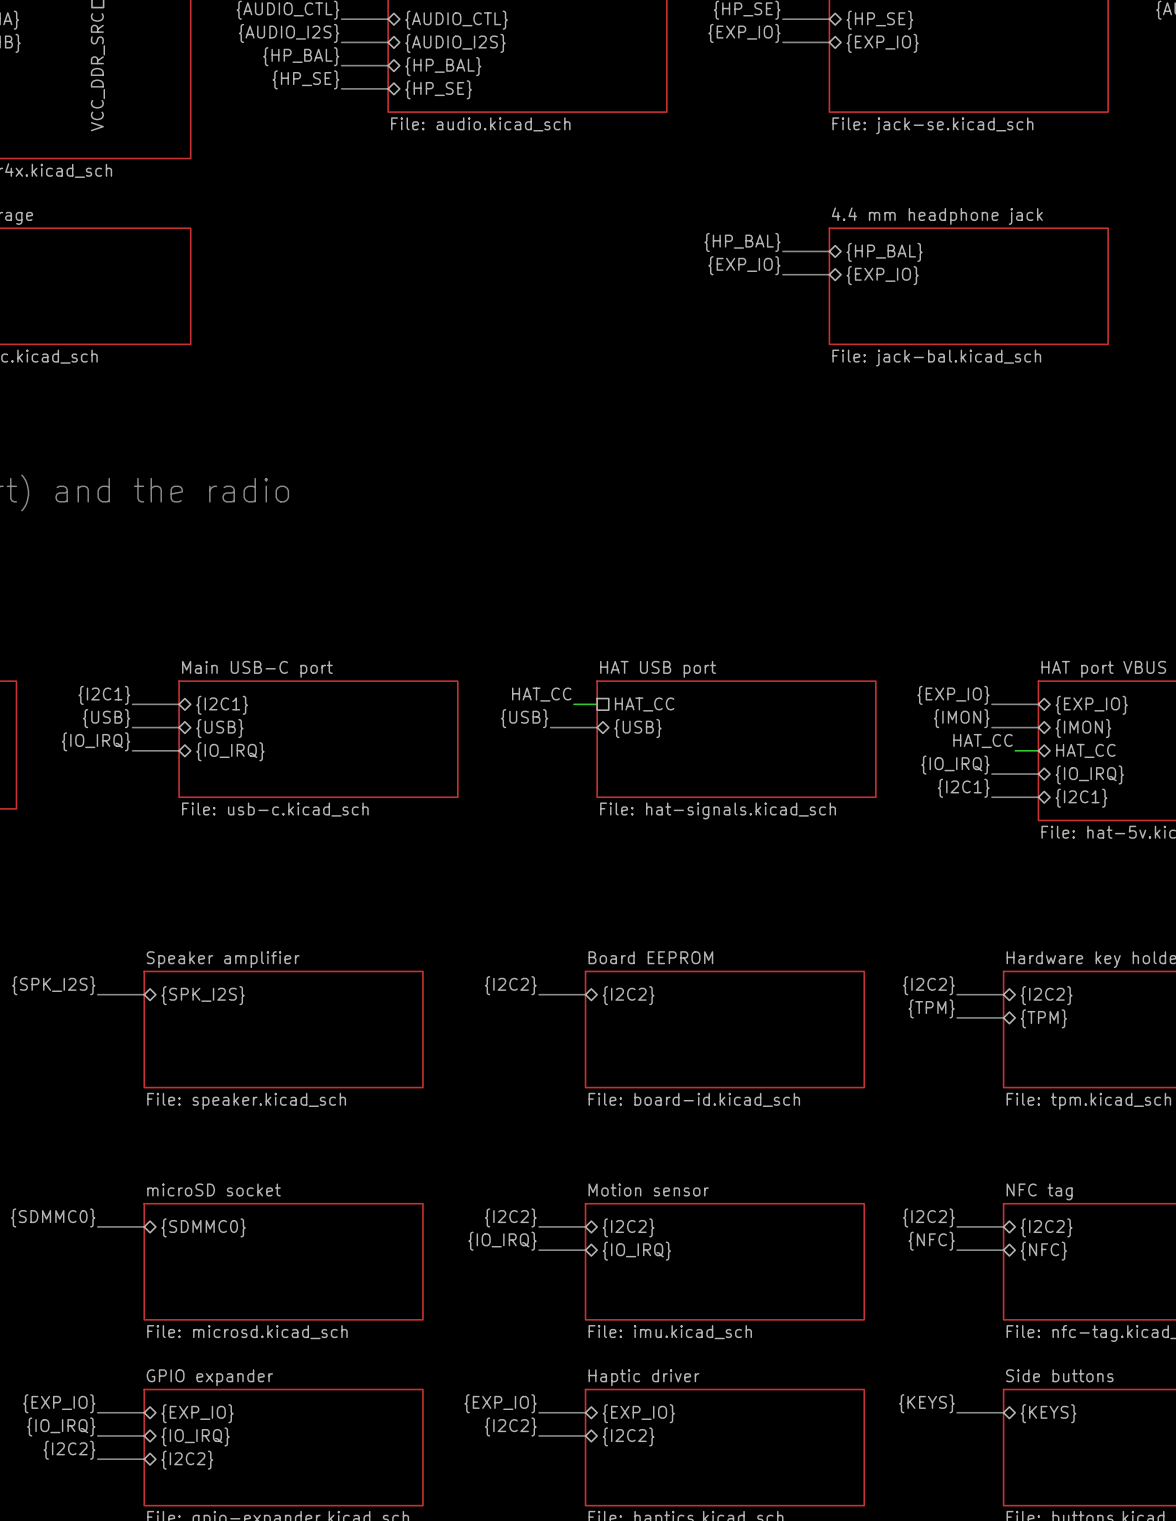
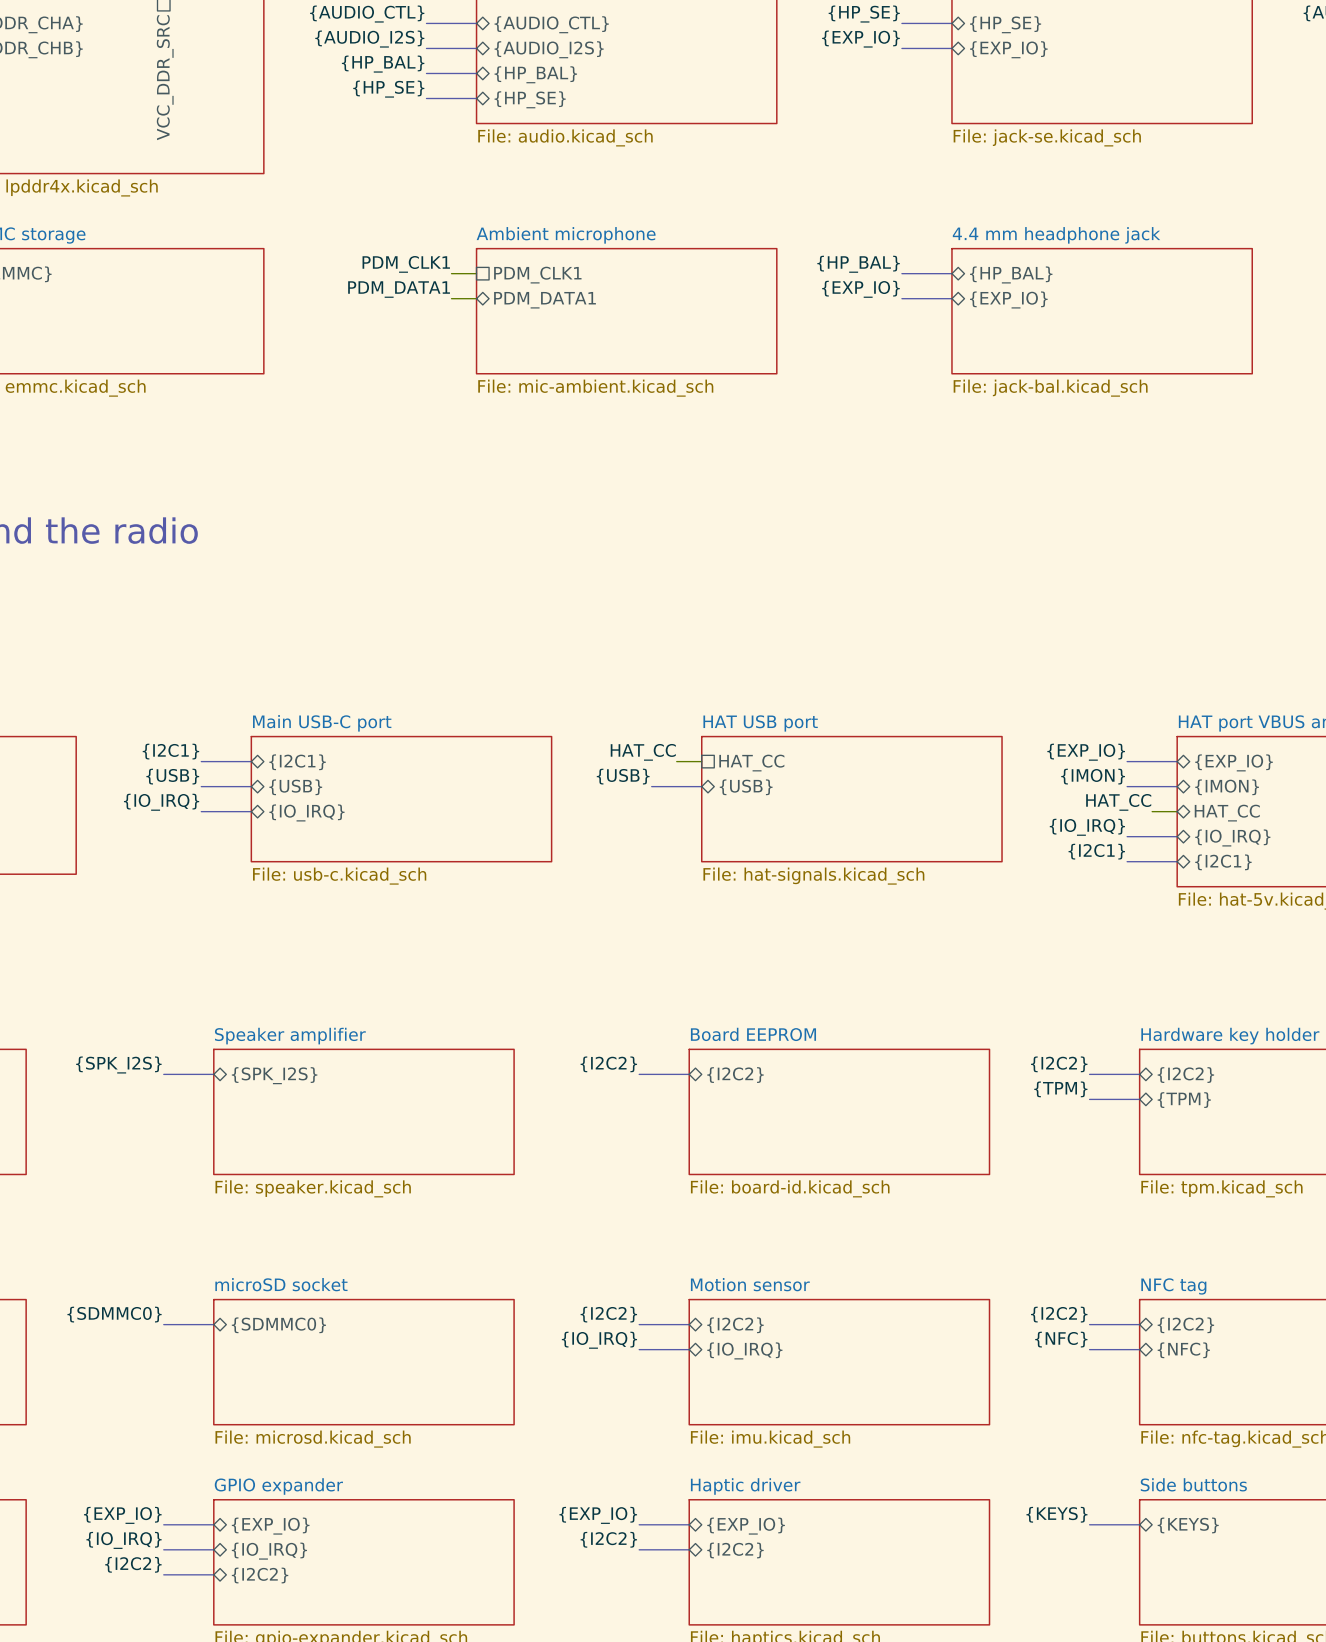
label: none -> PDM_CLK1 (406, 264)
wire: none -> (451, 273) (476, 273)
sheet pin: none -> PDM_CLK1 (537, 275)
label: none -> PDM_DATA1 (399, 289)
wire: none -> (451, 298) (476, 298)
sheet pin: none -> PDM_DATA1 (545, 300)
sheet Ambient microphone: none -> File: mic-ambient.kicad_sch (626, 311)

